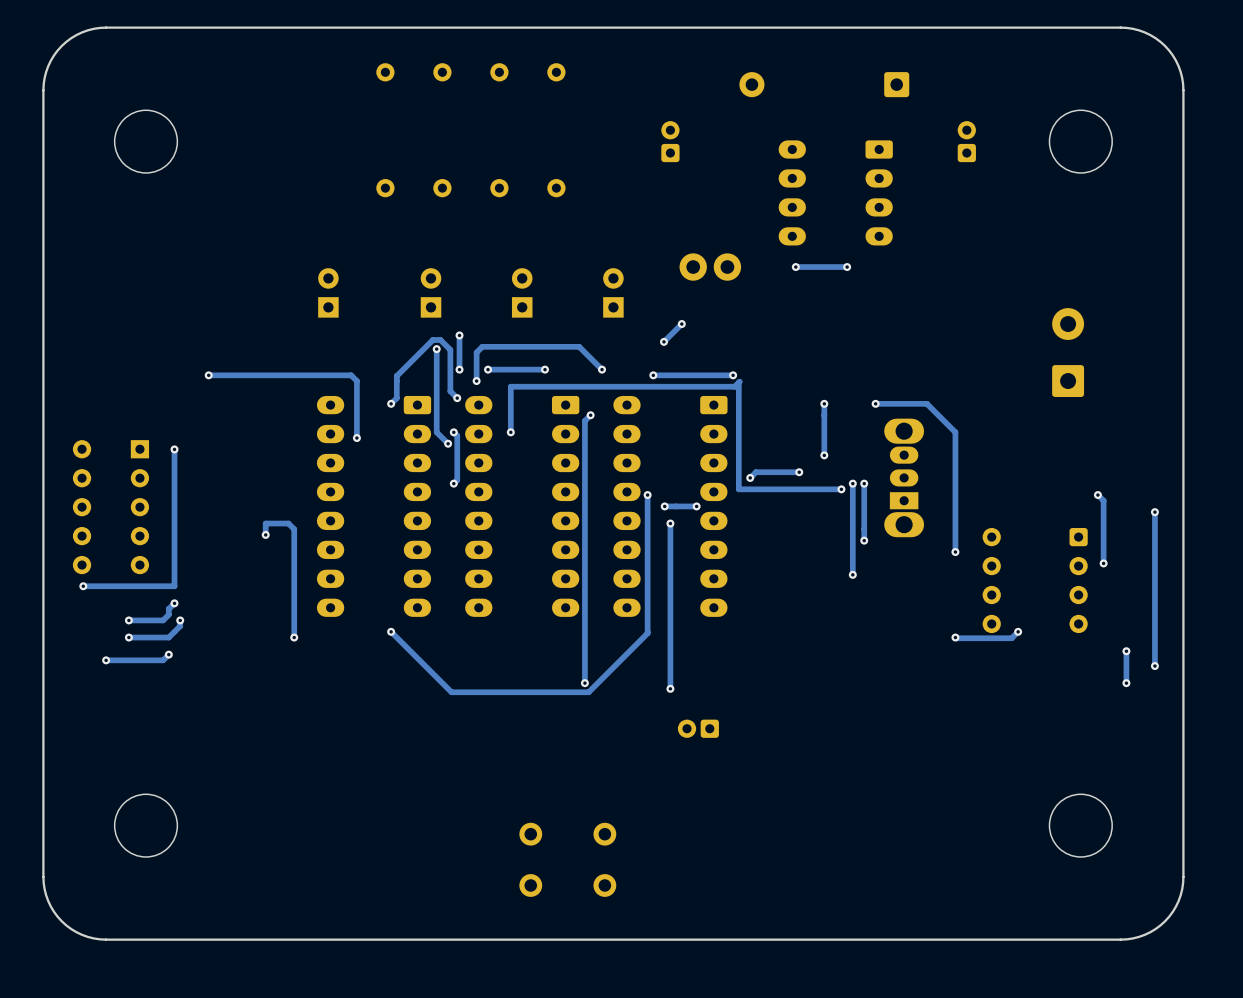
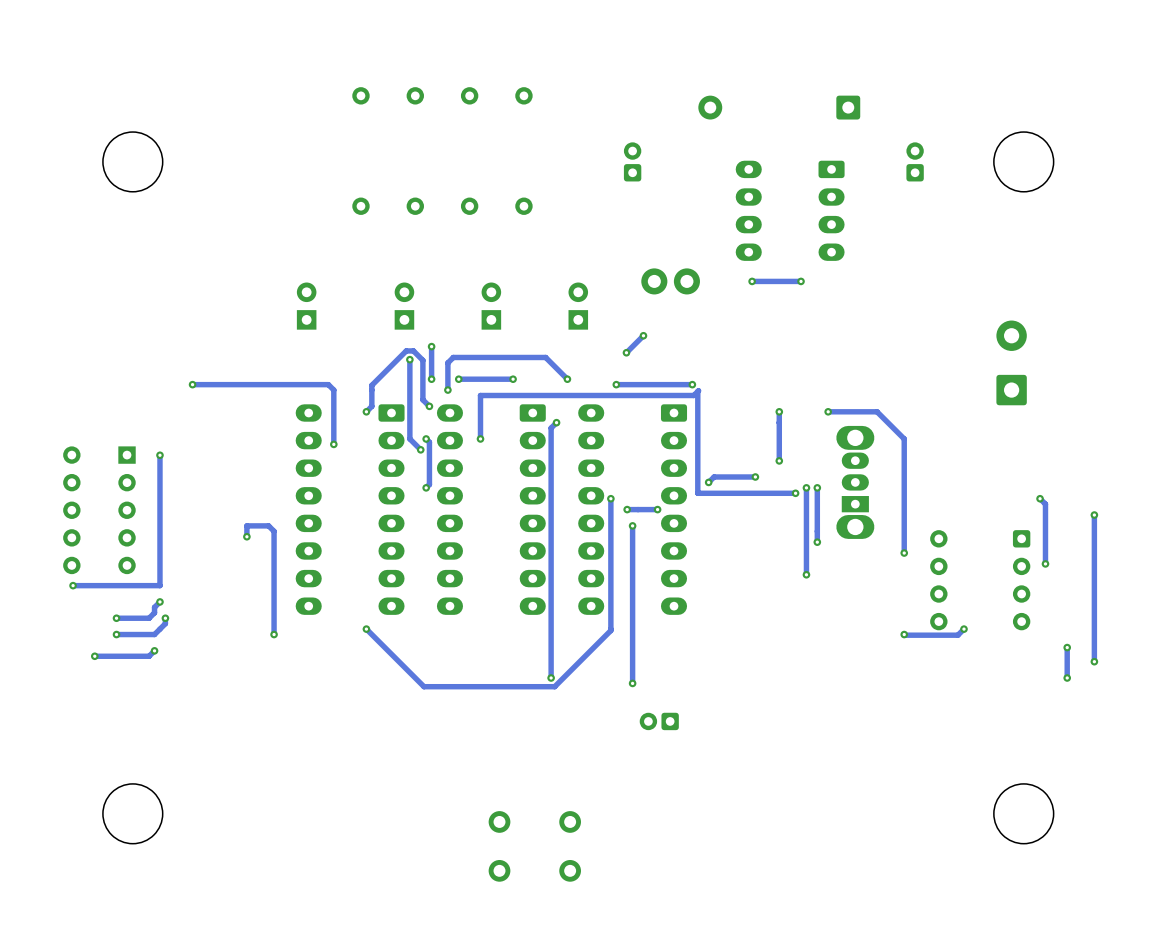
board edge: (1120, 27) (106, 27) (82, 32) (66, 41) (57, 50) (48, 66) (43, 90) (43, 876) (48, 900) (57, 916) (76, 932) (87, 936) (106, 939) (1120, 939) (1138, 936) (1160, 925) (1176, 906) (1180, 895) (1183, 876) (1183, 90) (1178, 66) (1165, 45) (1144, 32) (1120, 27) -> none

